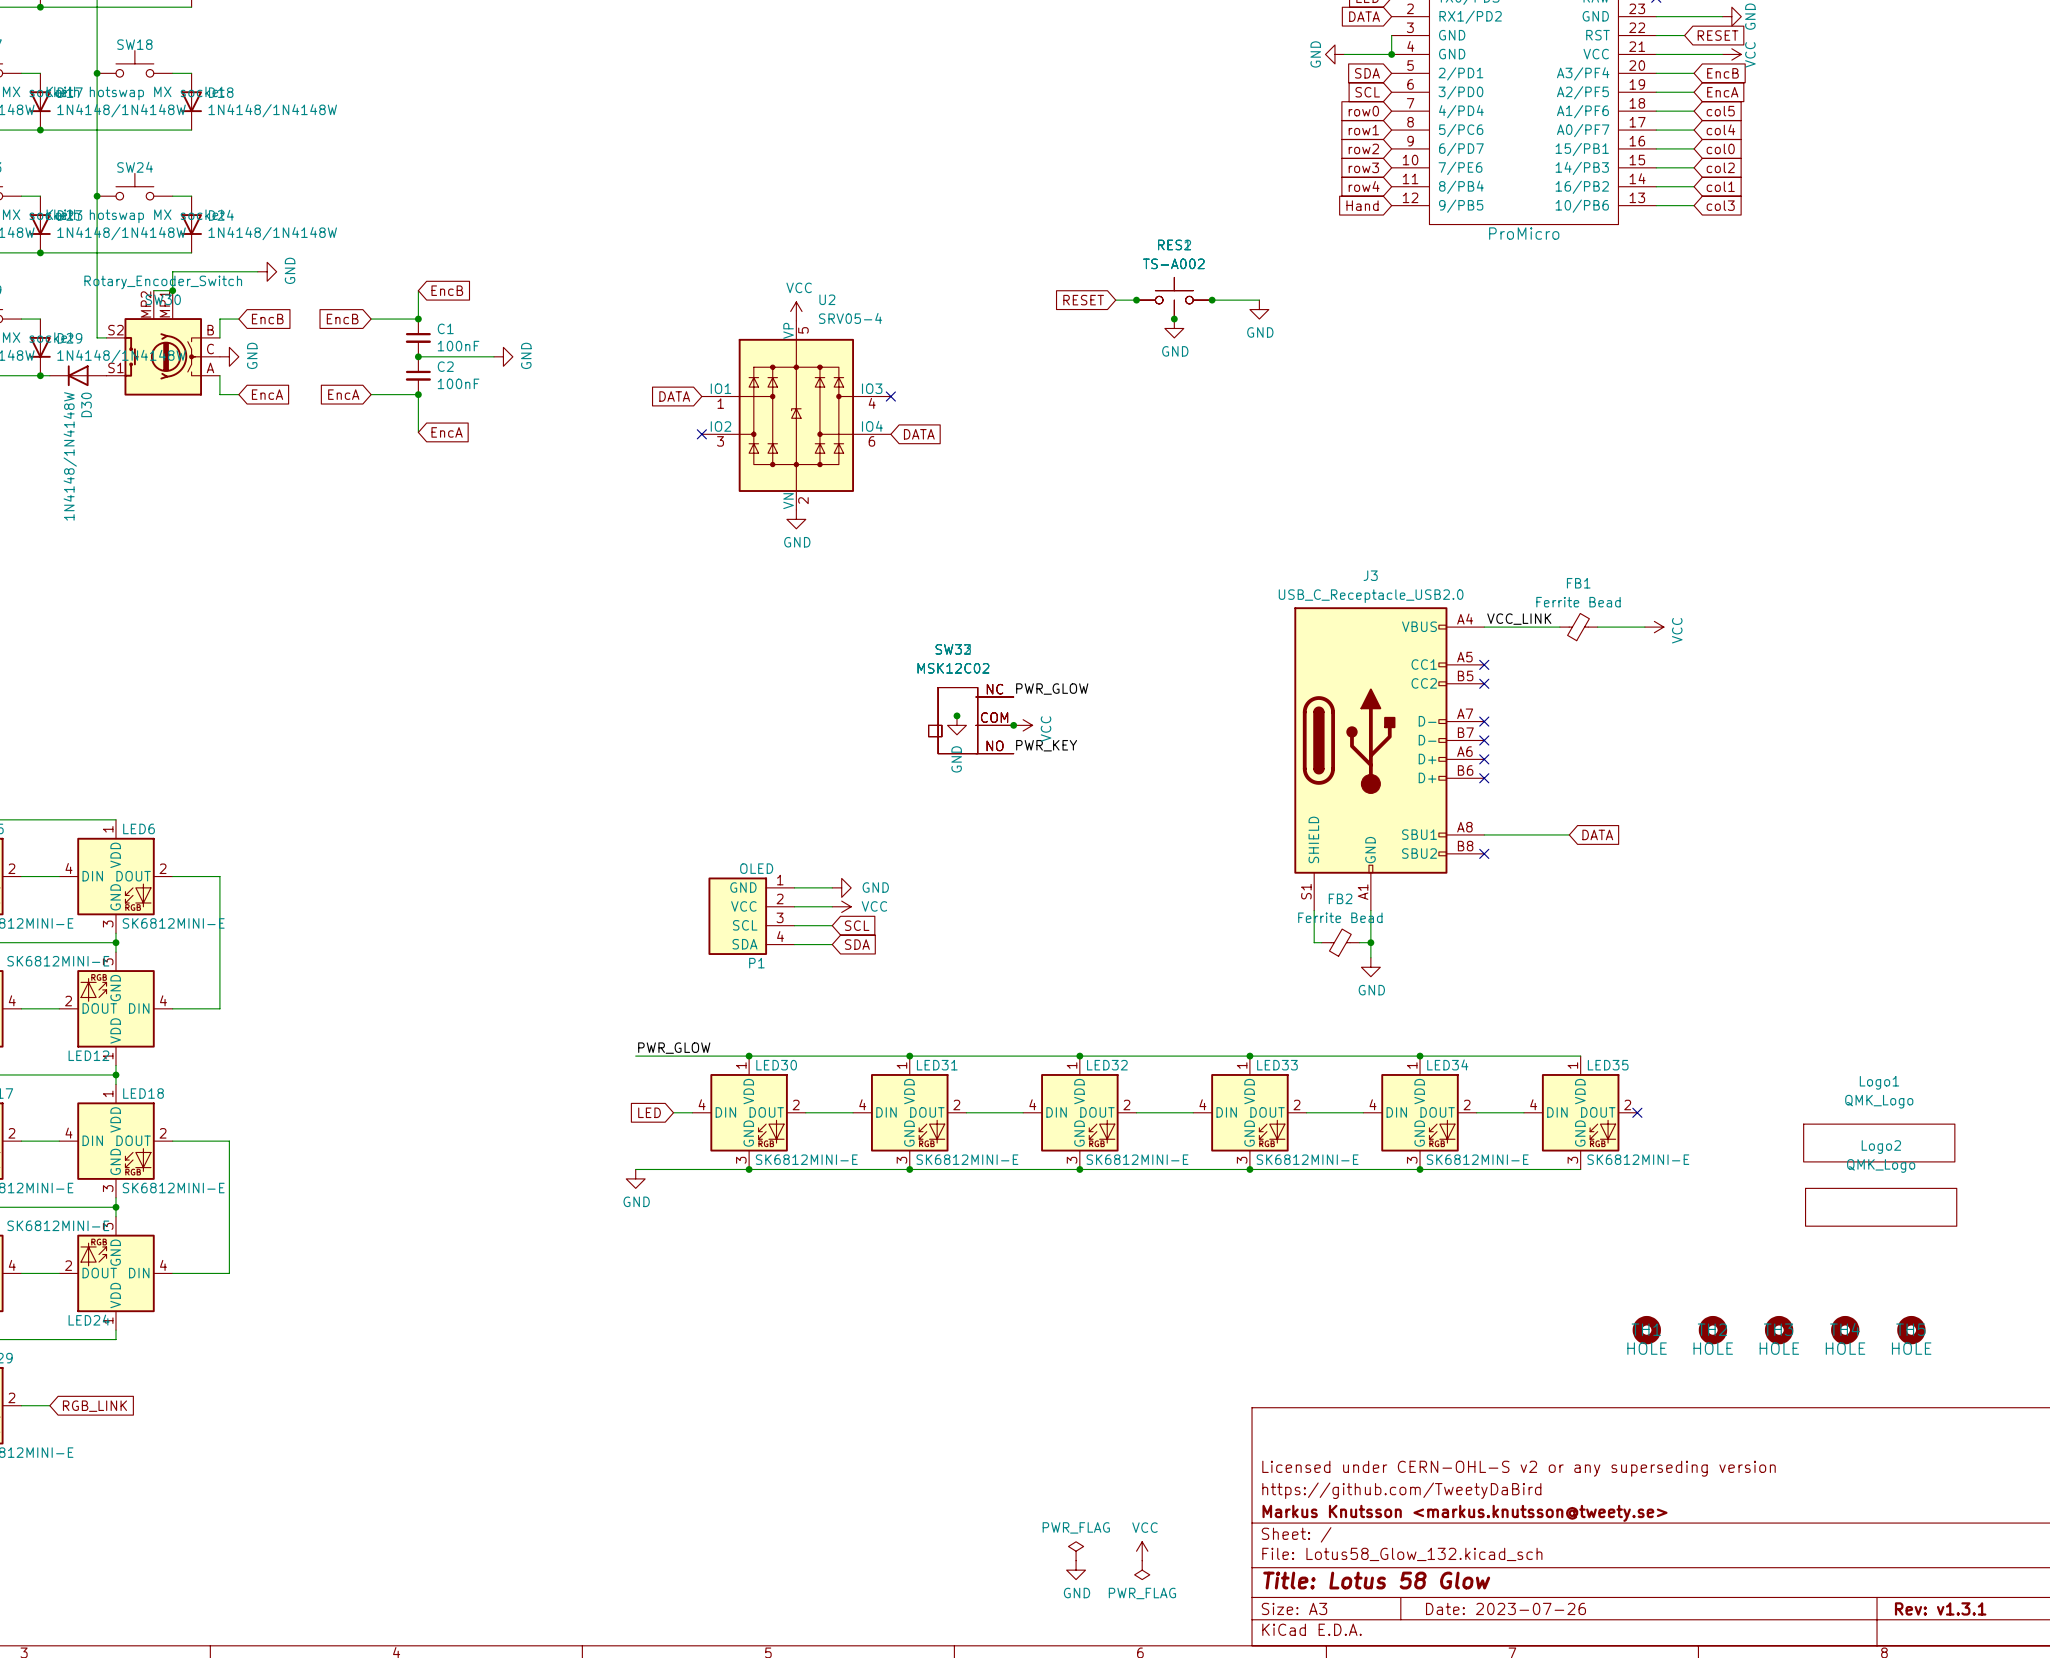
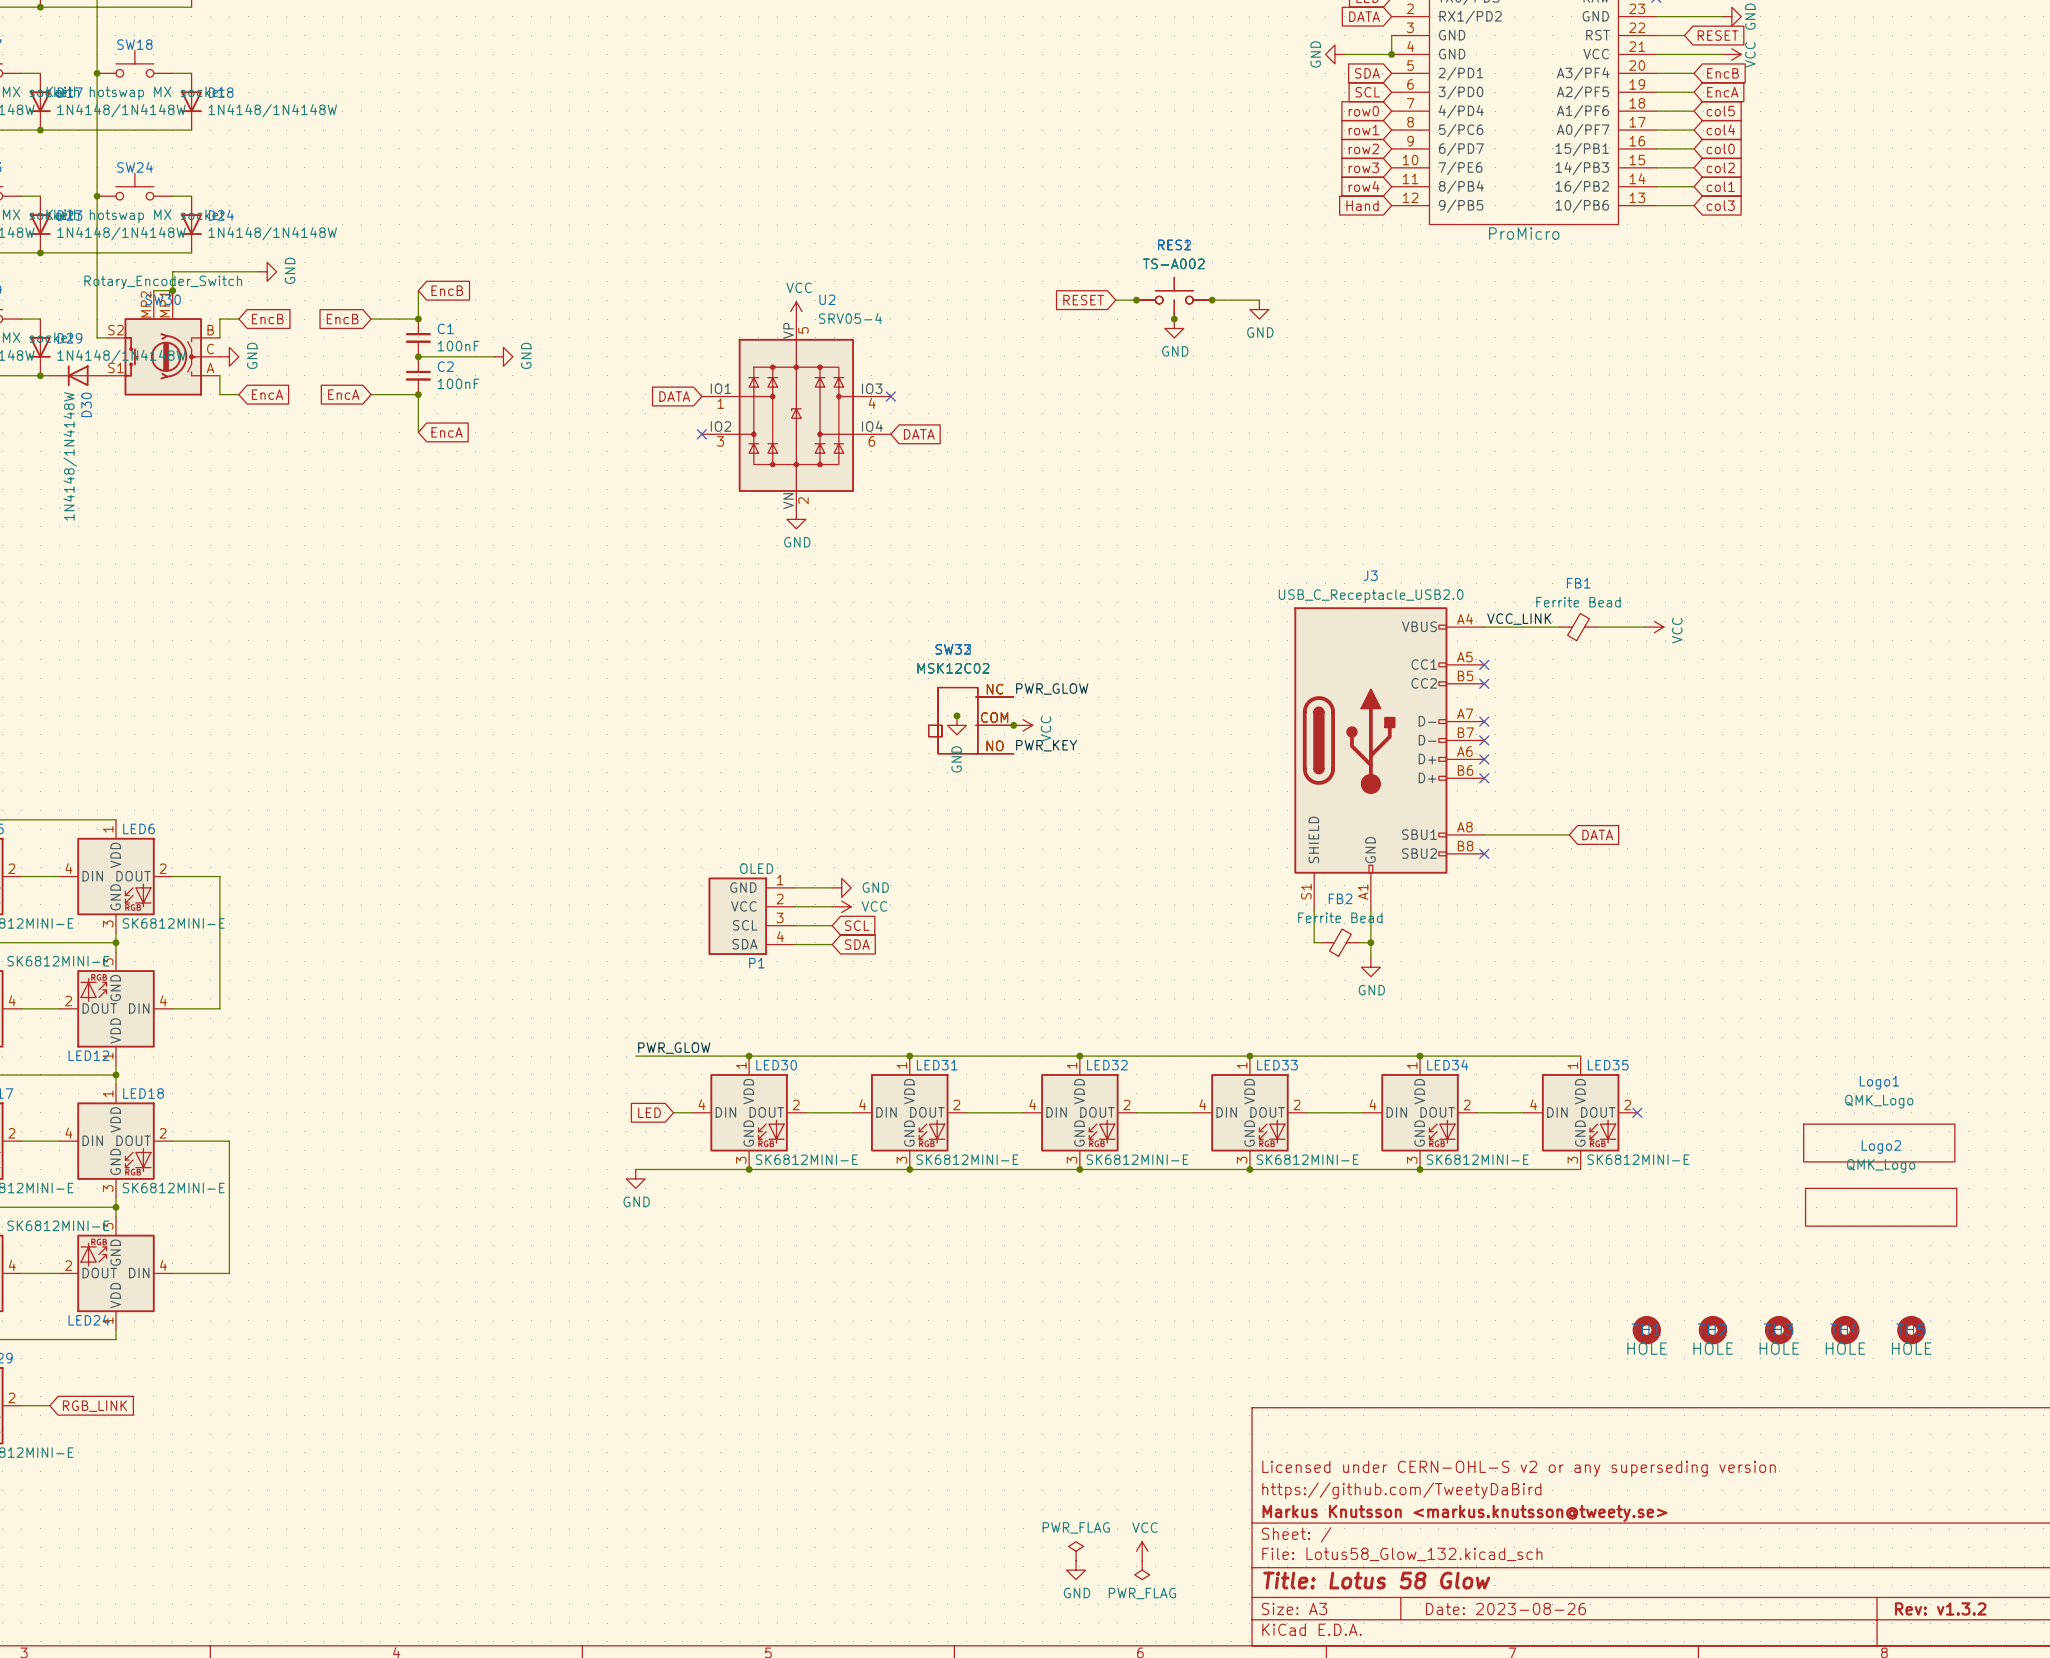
title block: Date: 2023-07-26 (1506, 1608) -> Date: 2023-08-26 (1506, 1608)
title block: Rev: v1.3.1 (1940, 1608) -> Rev: v1.3.2 (1940, 1608)

